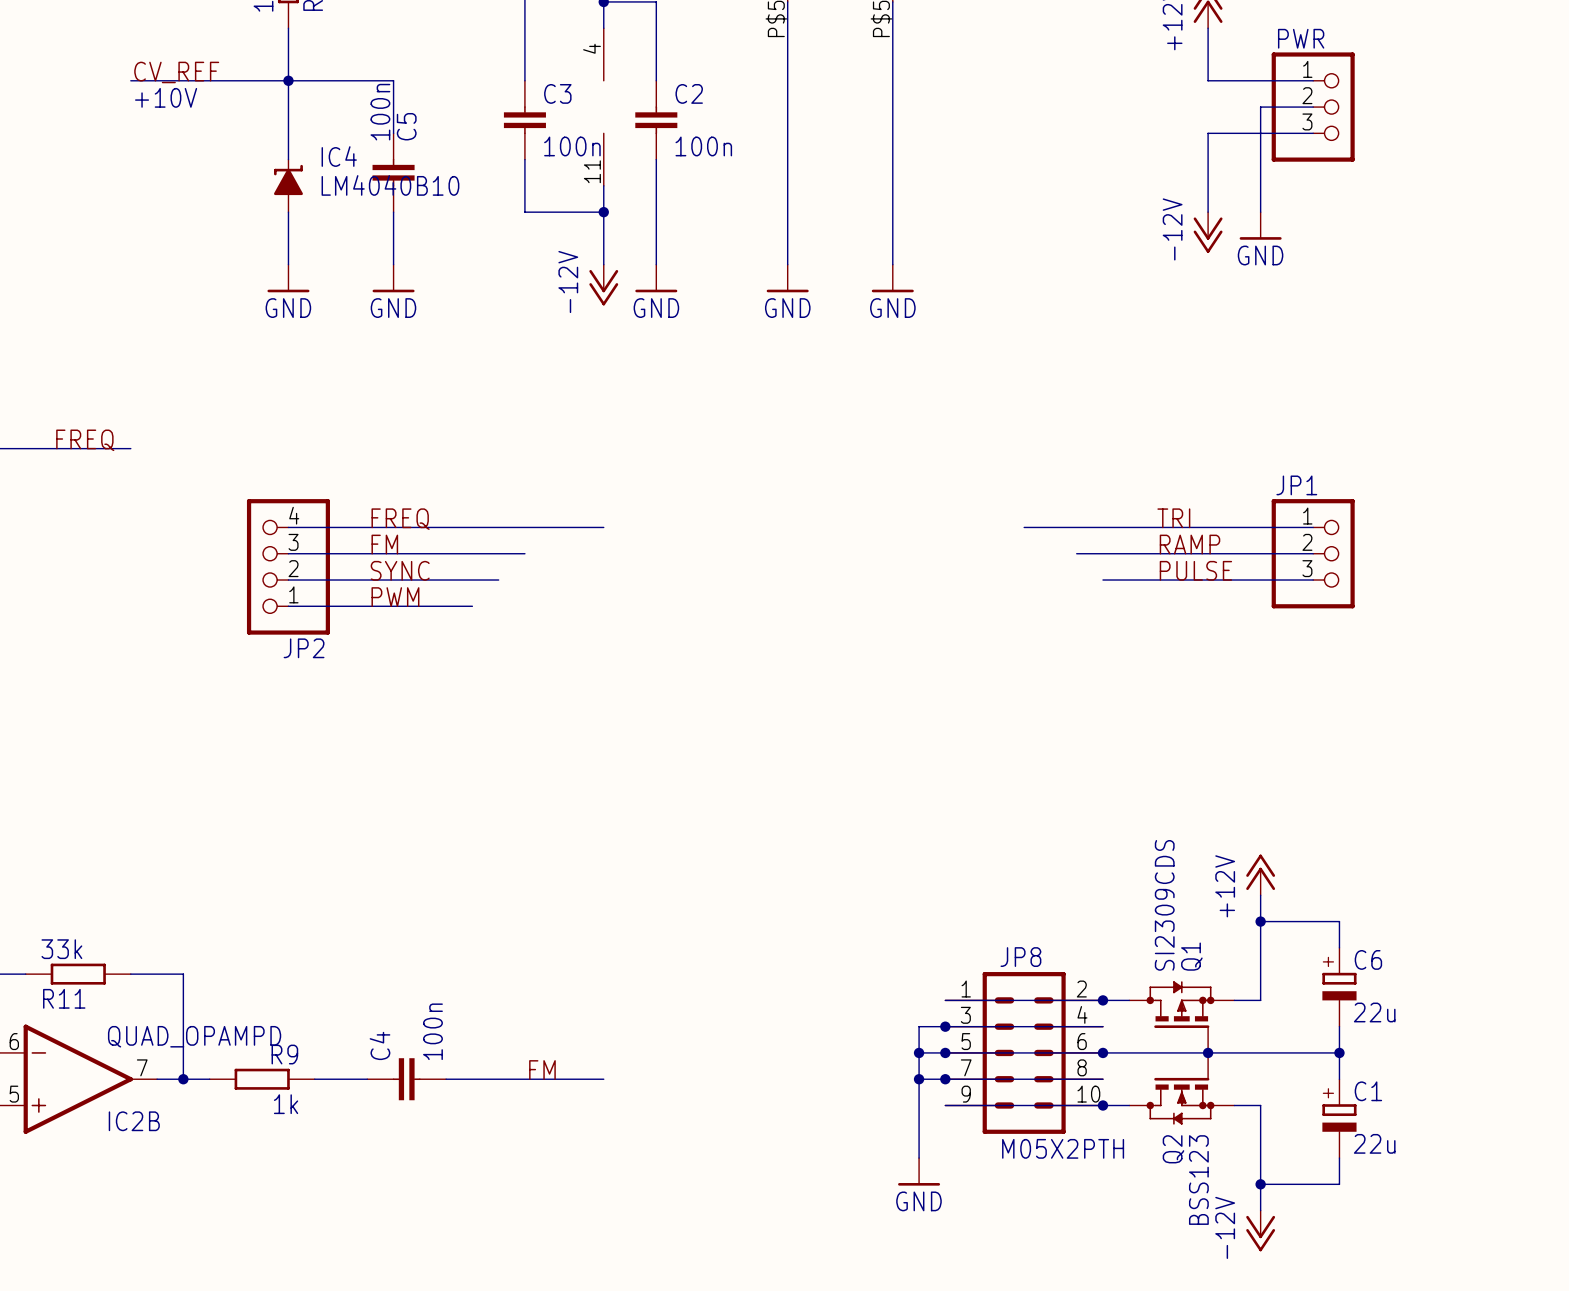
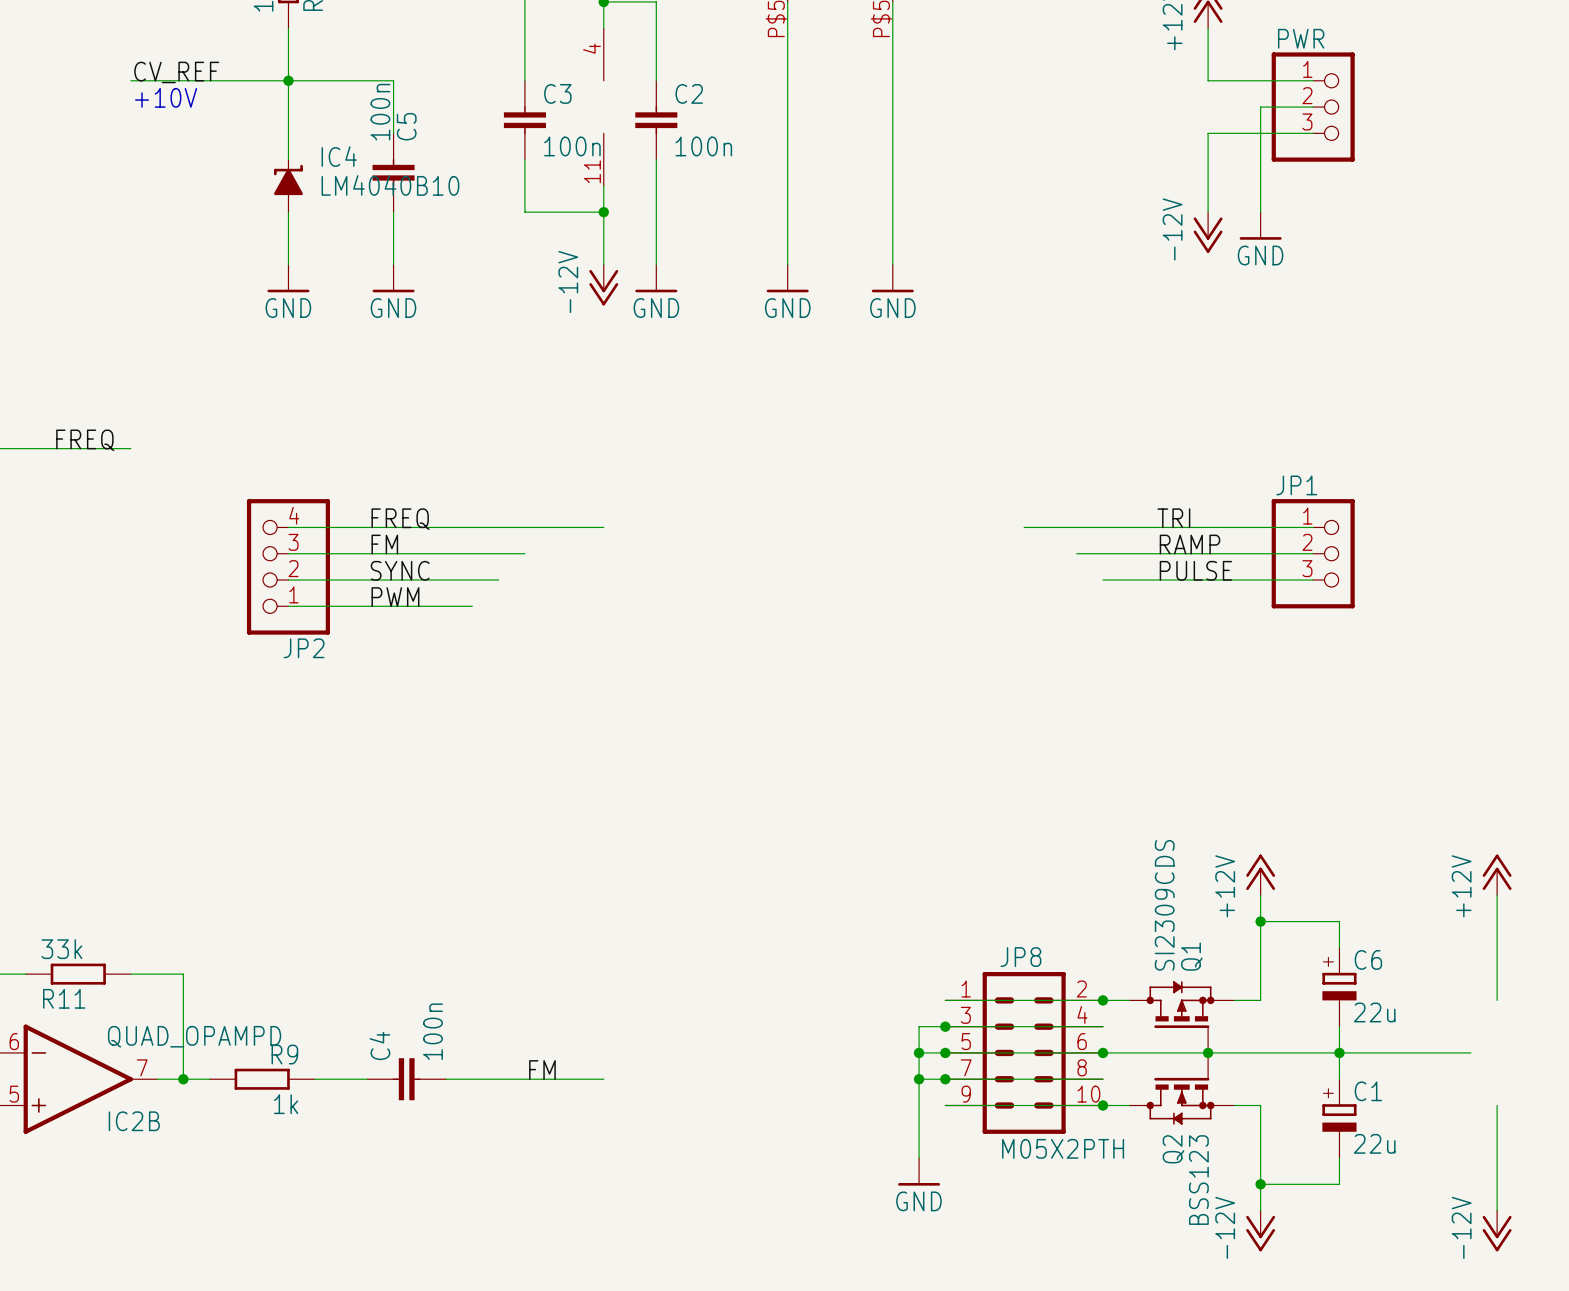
power symbol: none -> +12V (1497, 874)
wire: none -> (1497, 895) (1497, 1000)
wire: none -> (1339, 1052) (1470, 1052)
wire: none -> (1497, 1105) (1497, 1210)
power symbol: none -> -12V (1497, 1230)

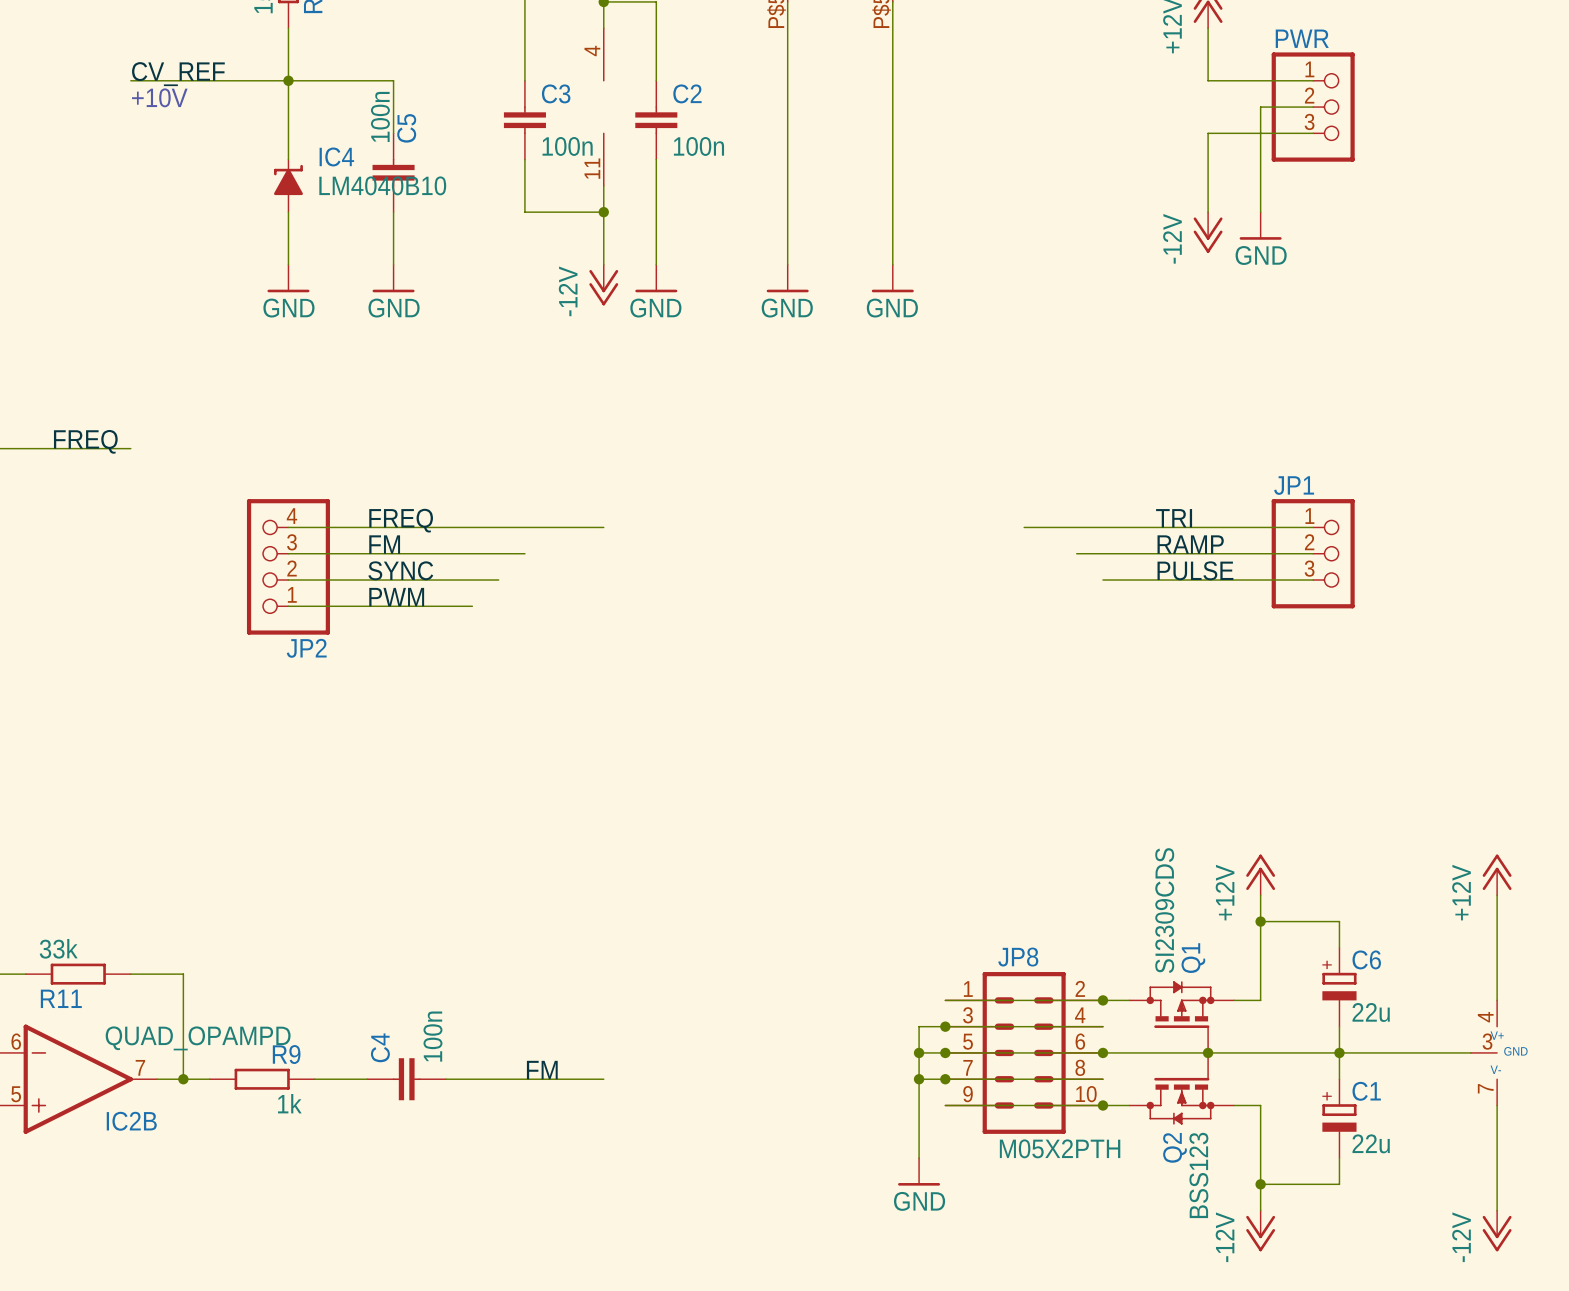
part: none -> (1483, 1052)

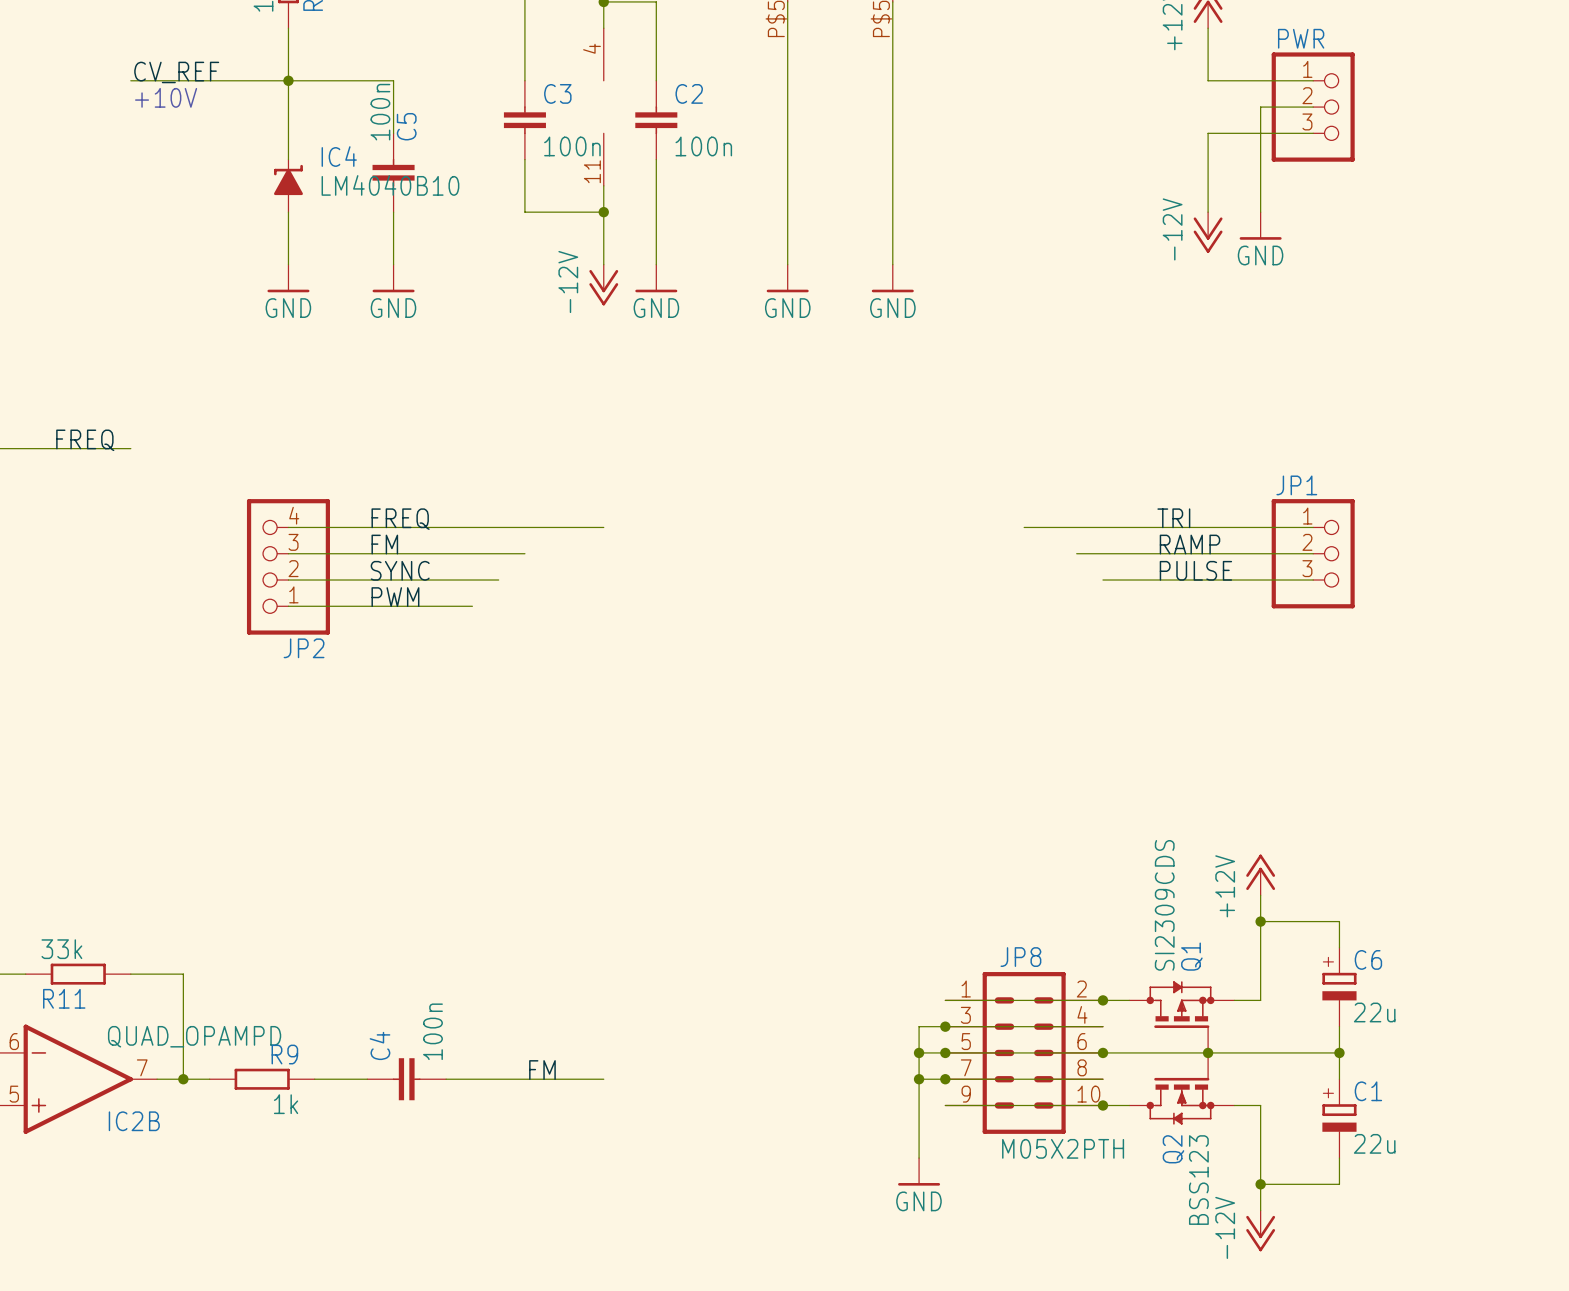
power symbol: +12V (1497, 874) -> none
wire: (1497, 895) (1497, 1000) -> none
wire: (1339, 1052) (1470, 1052) -> none
part: (1483, 1052) -> none
wire: (1497, 1105) (1497, 1210) -> none
power symbol: -12V (1497, 1230) -> none

